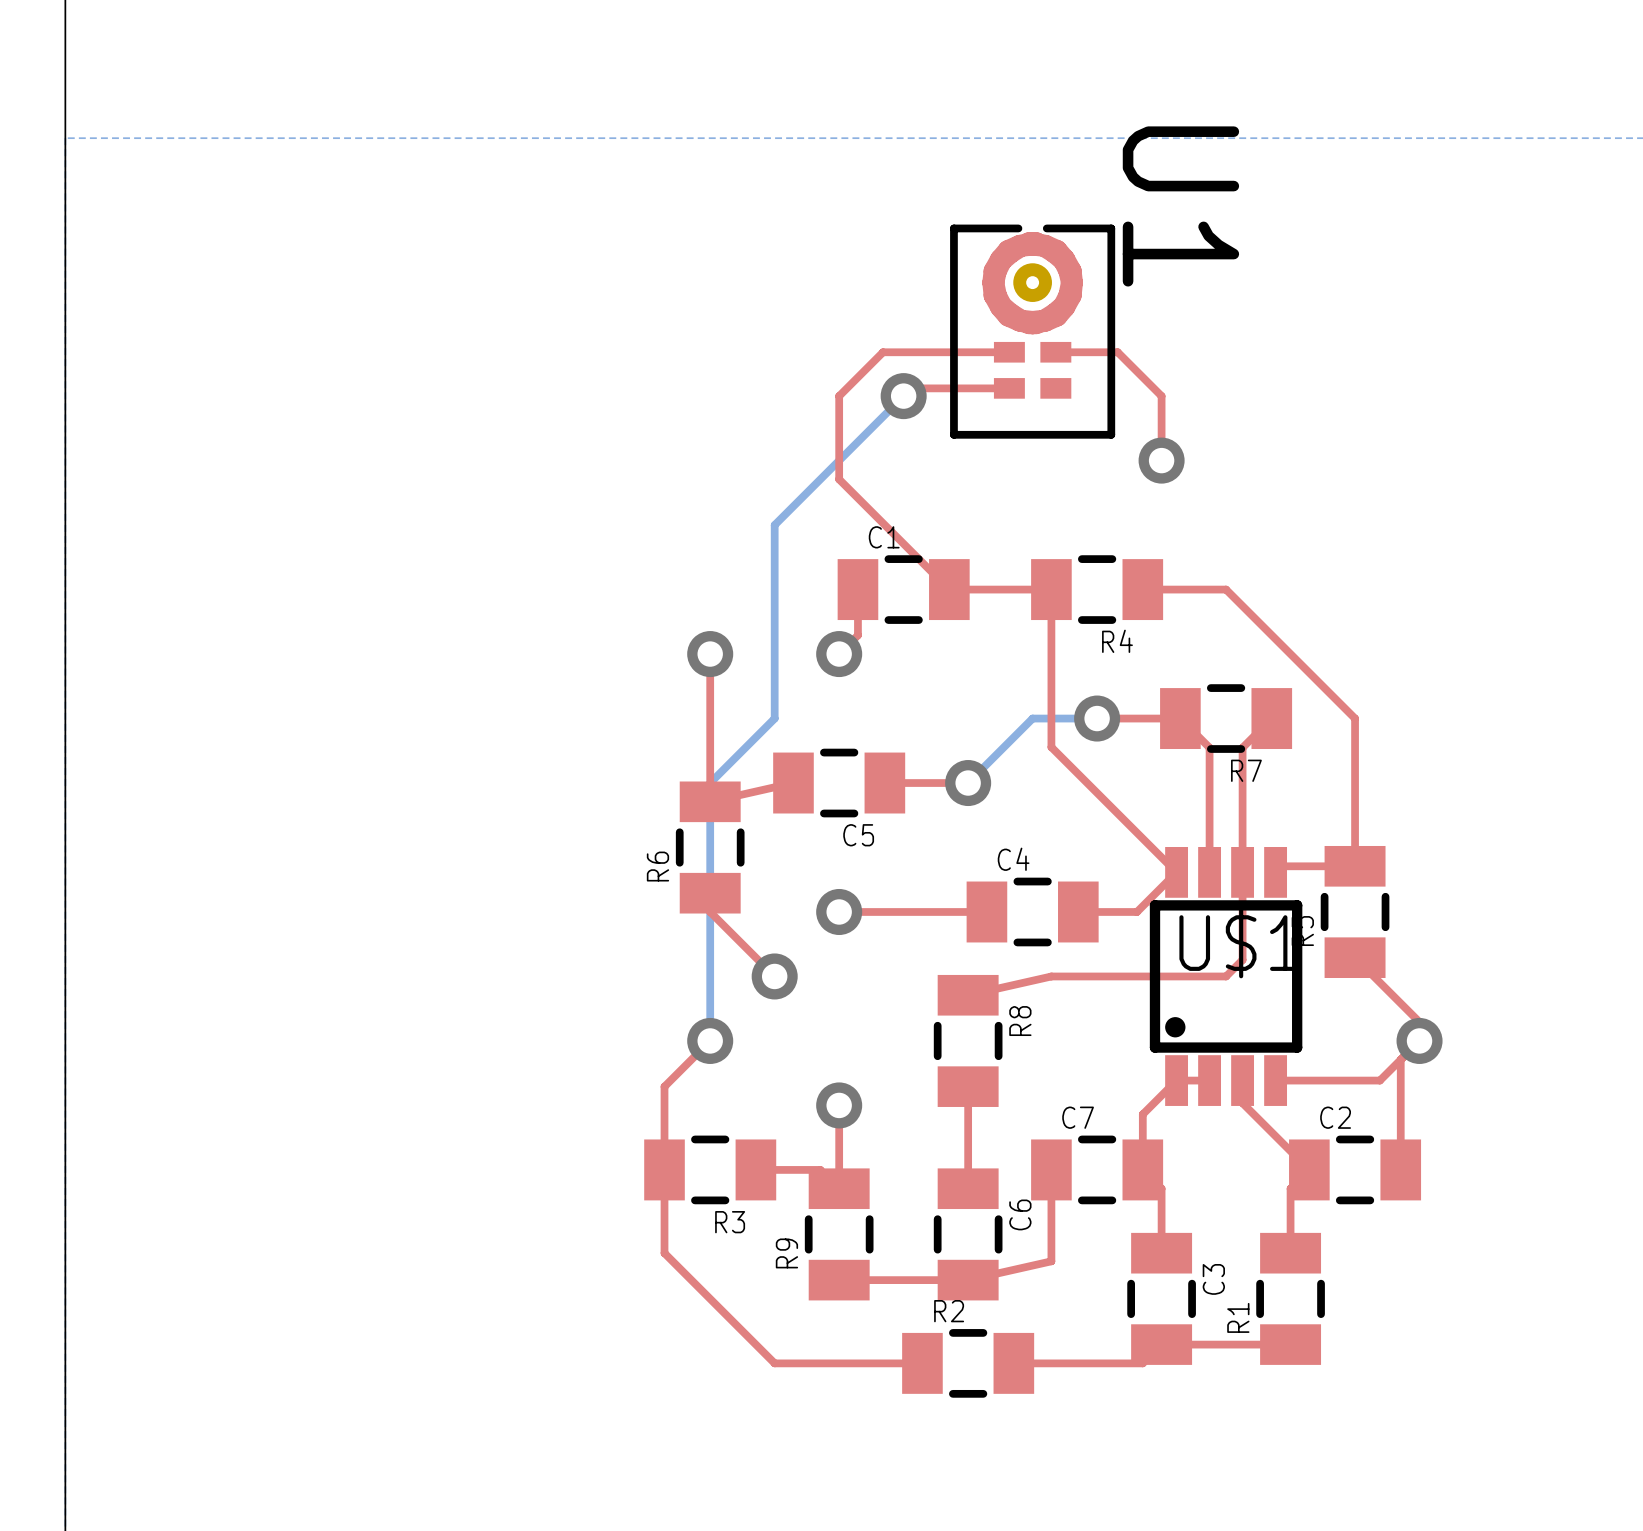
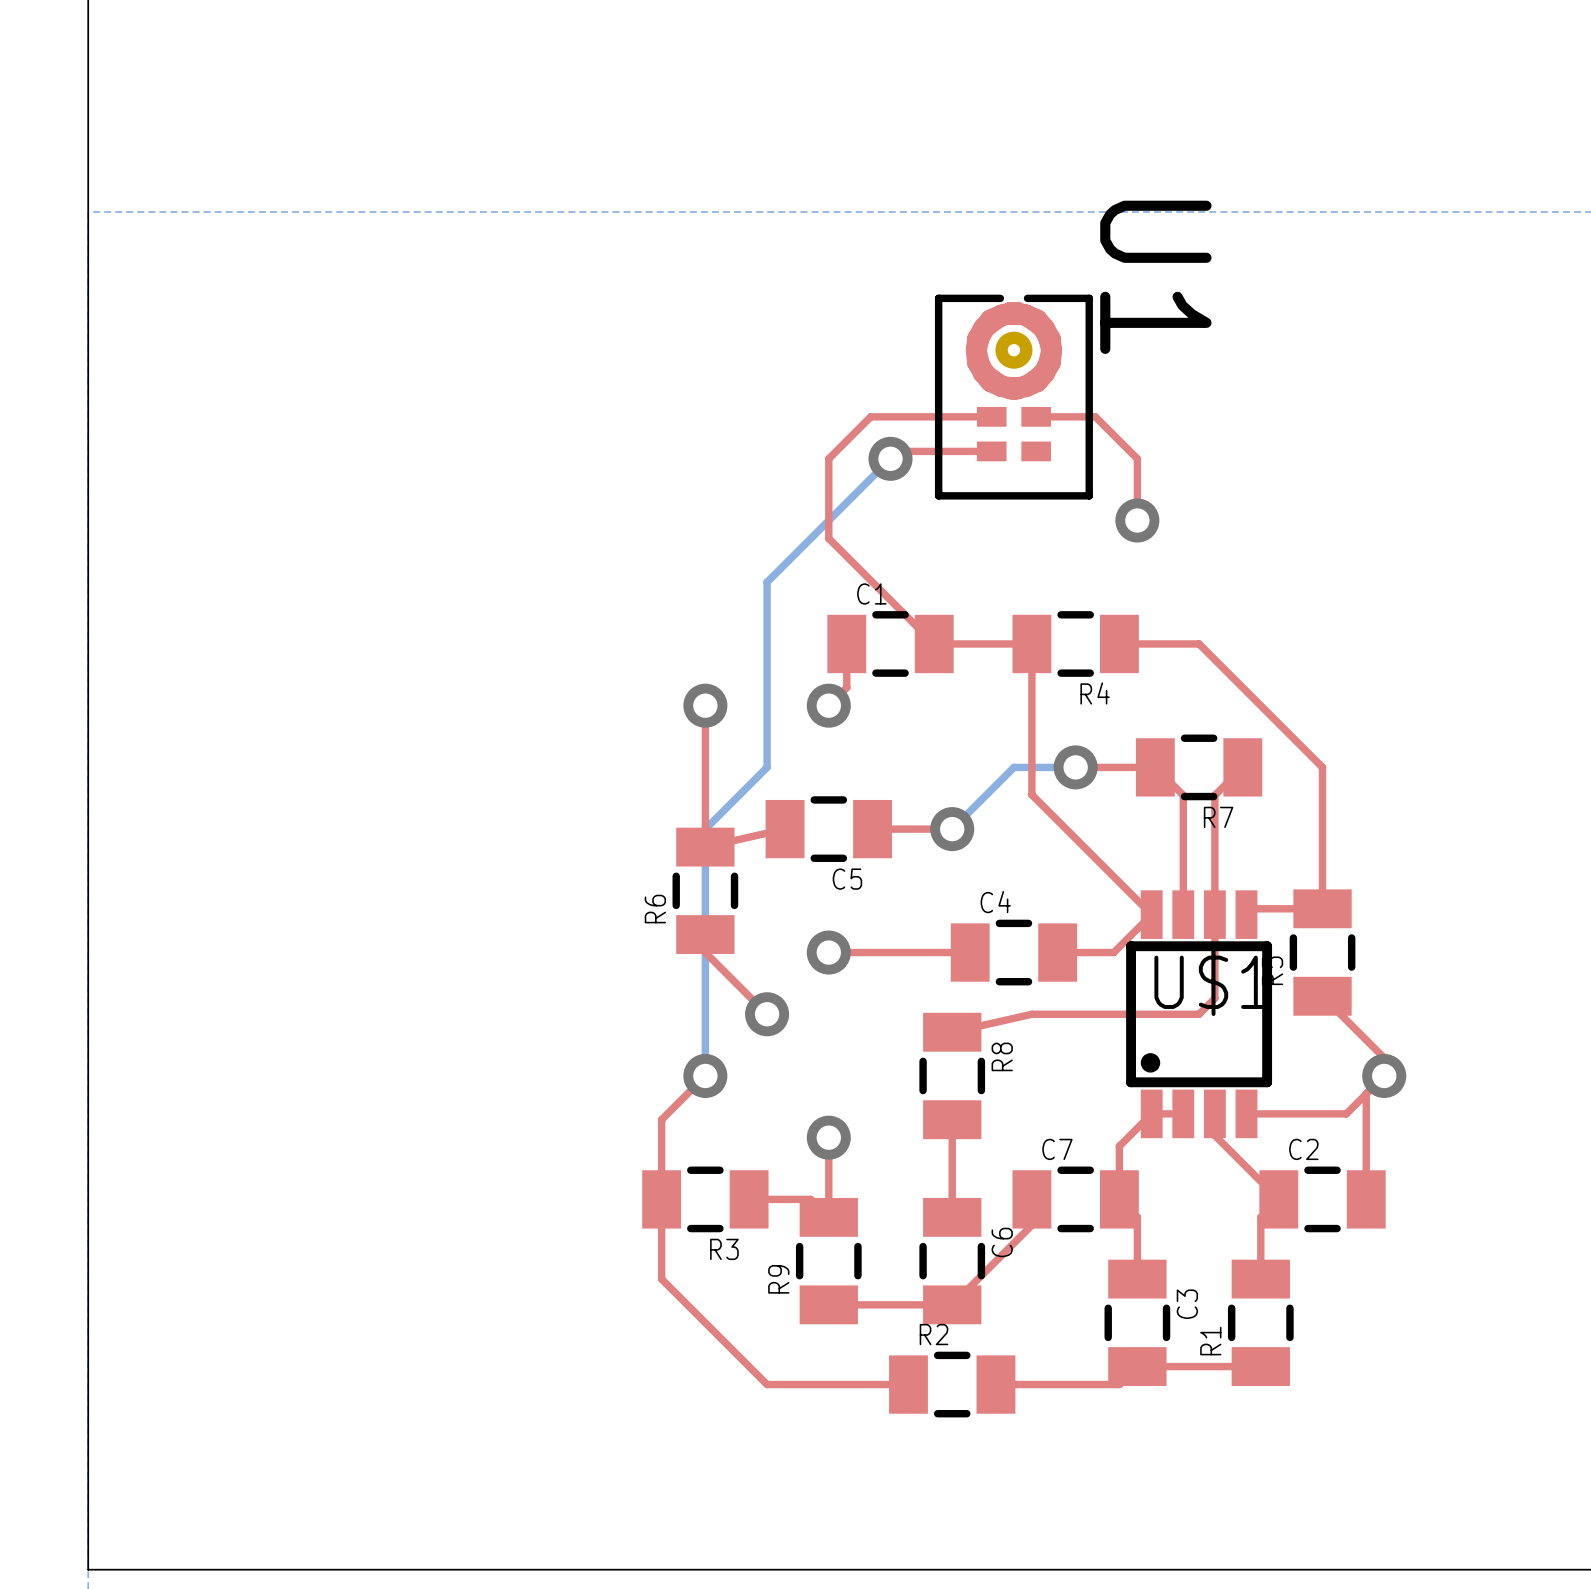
top track: (1051, 1196) (1051, 1261) (968, 1280) -> (1031, 1225) (952, 1304)

